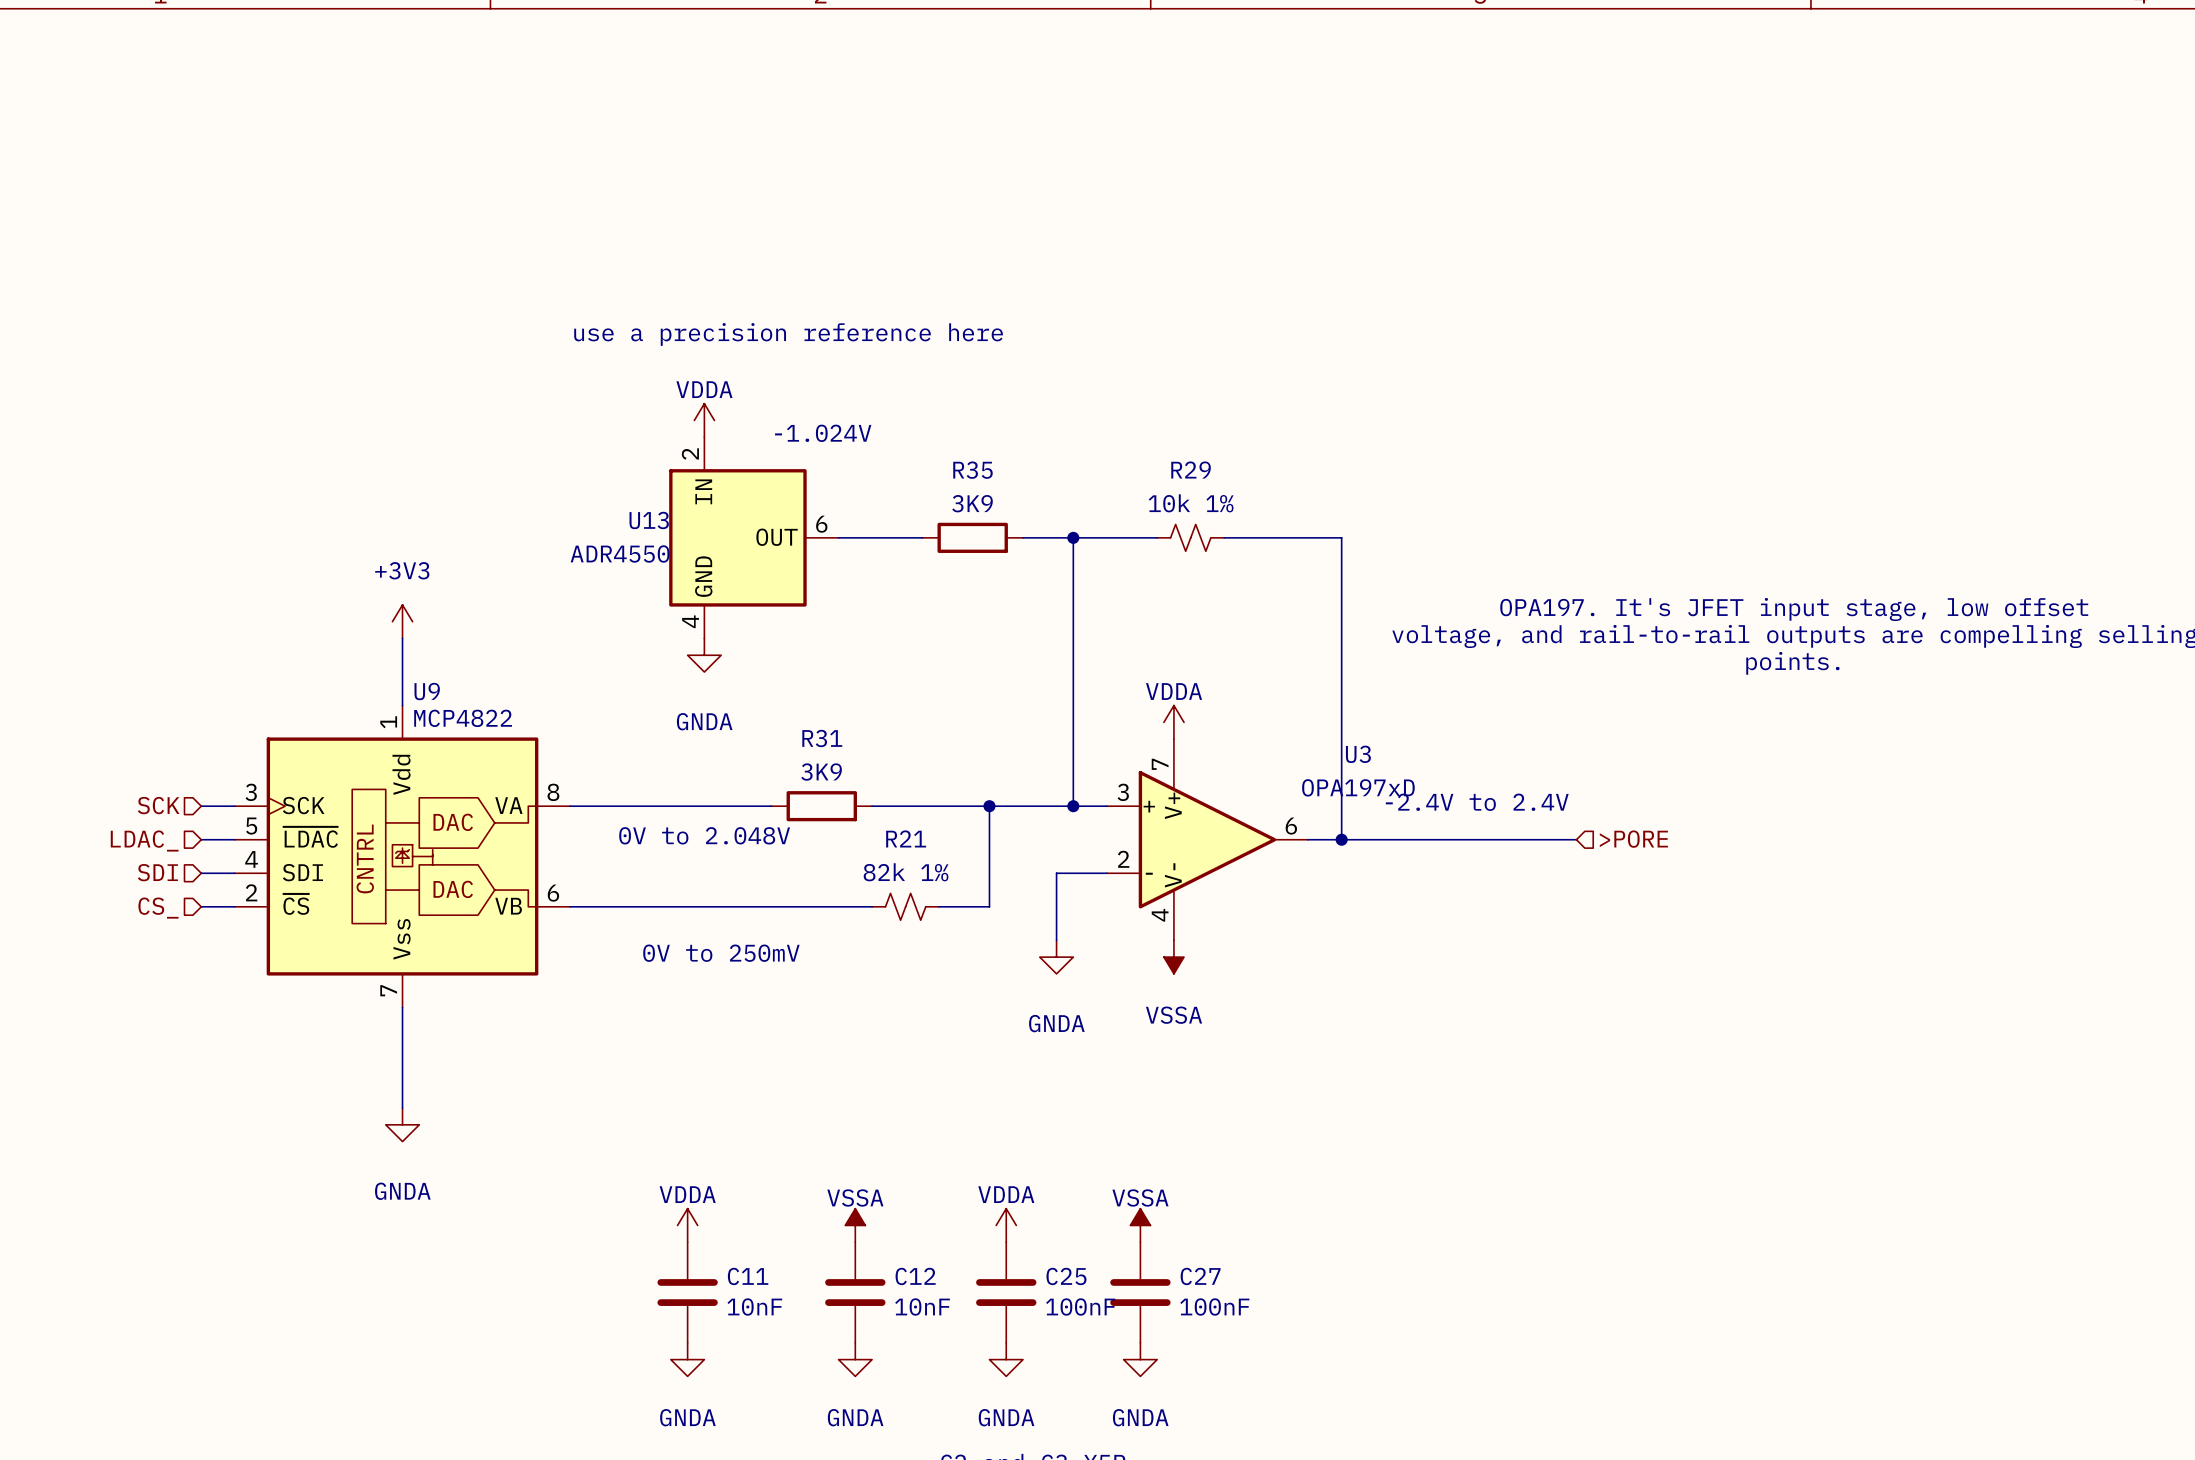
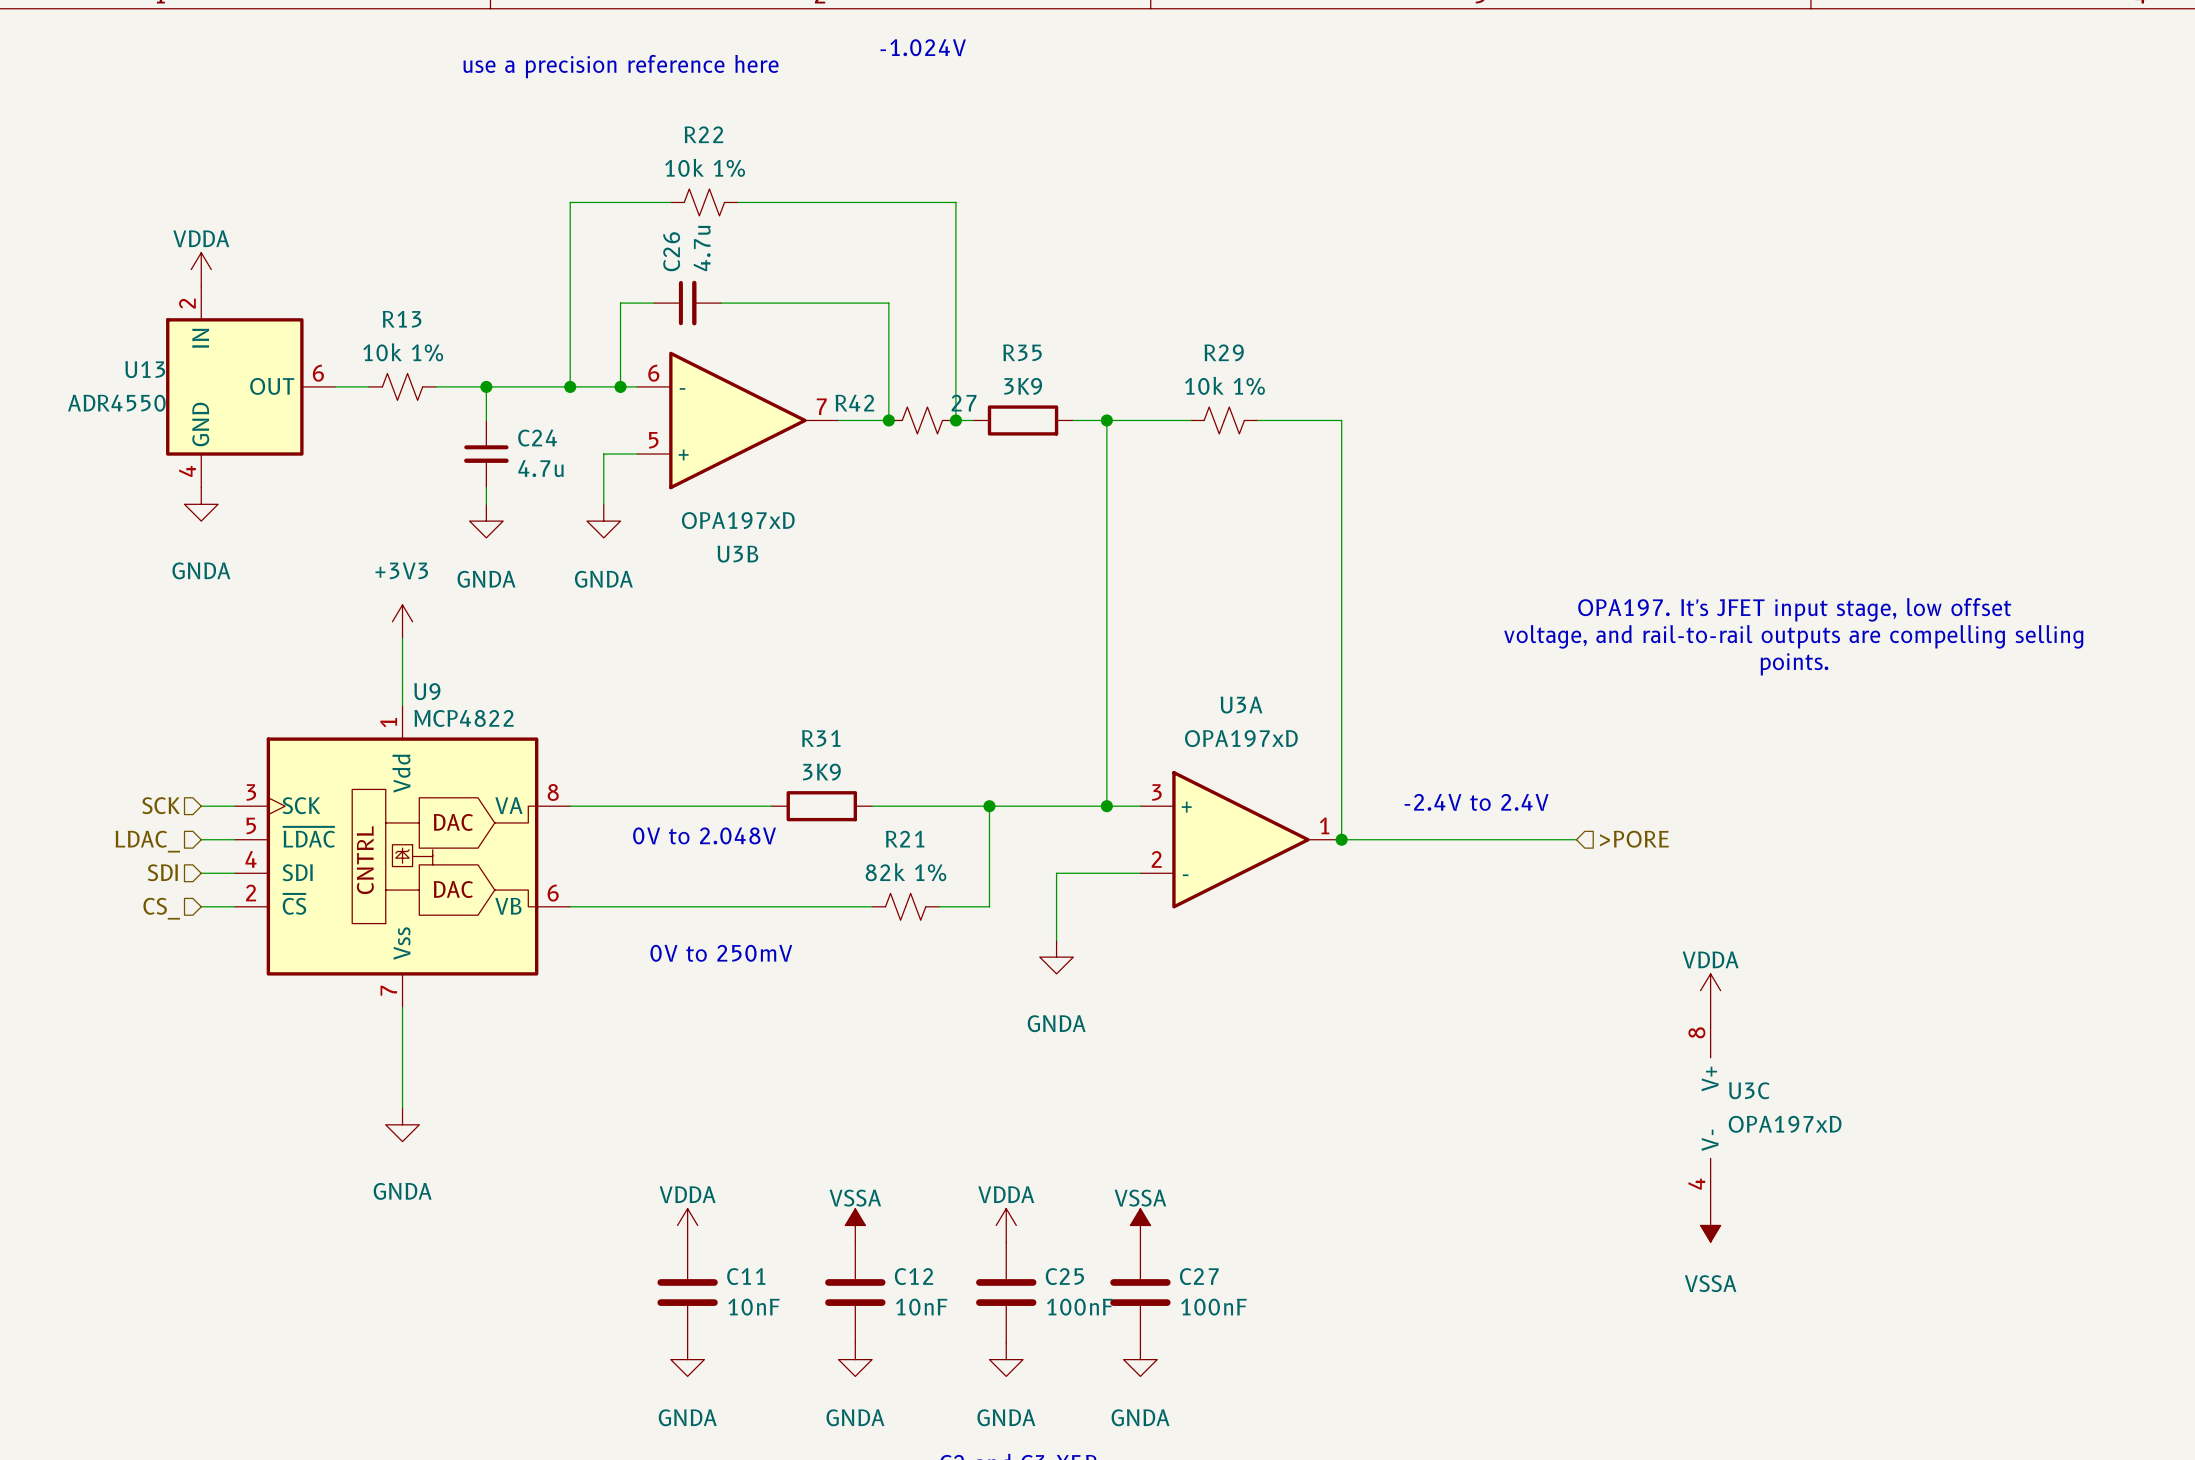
text: none -> -1.024V (923, 47)
wire: none -> (670, 202) (570, 202) (570, 386)
R22: none -> 10k 1% (704, 202)
wire: none -> (737, 202) (955, 202) (955, 420) (972, 420)
power symbol: none -> VDDA (201, 269)
wire: none -> (654, 303) (620, 303) (620, 386)
C26: none -> 4.7u (687, 303)
wire: none -> (721, 303) (888, 303) (888, 420) (838, 420)
text position: use a precision reference here (788, 334) -> use a precision reference here (621, 66)
wire: none -> (335, 386) (368, 386)
R13: none -> 10k 1% (402, 386)
wire: none -> (436, 386) (637, 386)
wire: none -> (486, 386) (486, 420)
junction: none -> (486, 386)
junction: none -> (570, 386)
junction: none -> (620, 386)
power symbol: VDDA (704, 420) -> none
U3B: none -> OPA197xD (737, 420)
junction: none -> (888, 420)
R42: none -> 27 (922, 420)
junction: none -> (955, 420)
wire: none -> (1073, 420) (1190, 420)
wire: none -> (1106, 420) (1106, 806) (1140, 806)
junction: none -> (1106, 420)
text: -1.024V (823, 433) -> none
C24: none -> 4.7u (486, 454)
wire: none -> (637, 454) (603, 454) (603, 504)
wire: none -> (486, 487) (486, 504)
power symbol: none -> GNDA (201, 504)
power symbol: none -> GNDA (486, 521)
power symbol: none -> GNDA (603, 521)
U13 position: (753, 537) -> (250, 386)
wire: (838, 537) (922, 537) -> none
R35 position: (972, 537) -> (1023, 420)
wire: (1023, 537) (1157, 537) -> none
wire: (1073, 537) (1073, 806) -> none
junction: (1073, 537) -> none
R29 position: (1190, 537) -> (1224, 420)
wire: (1224, 537) (1341, 537) -> (1257, 420) (1341, 420) (1341, 537)
power symbol: GNDA (704, 655) -> none
power symbol: VDDA (1173, 722) -> none
junction position: (1073, 806) -> (1106, 806)
U3: OPA197xD (1207, 839) -> none
U3A: none -> OPA197xD (1241, 839)
power symbol: VSSA (1173, 957) -> none
power symbol: none -> VDDA (1710, 990)
U3C: none -> OPA197xD (1710, 1108)
power symbol: none -> VSSA (1710, 1225)

